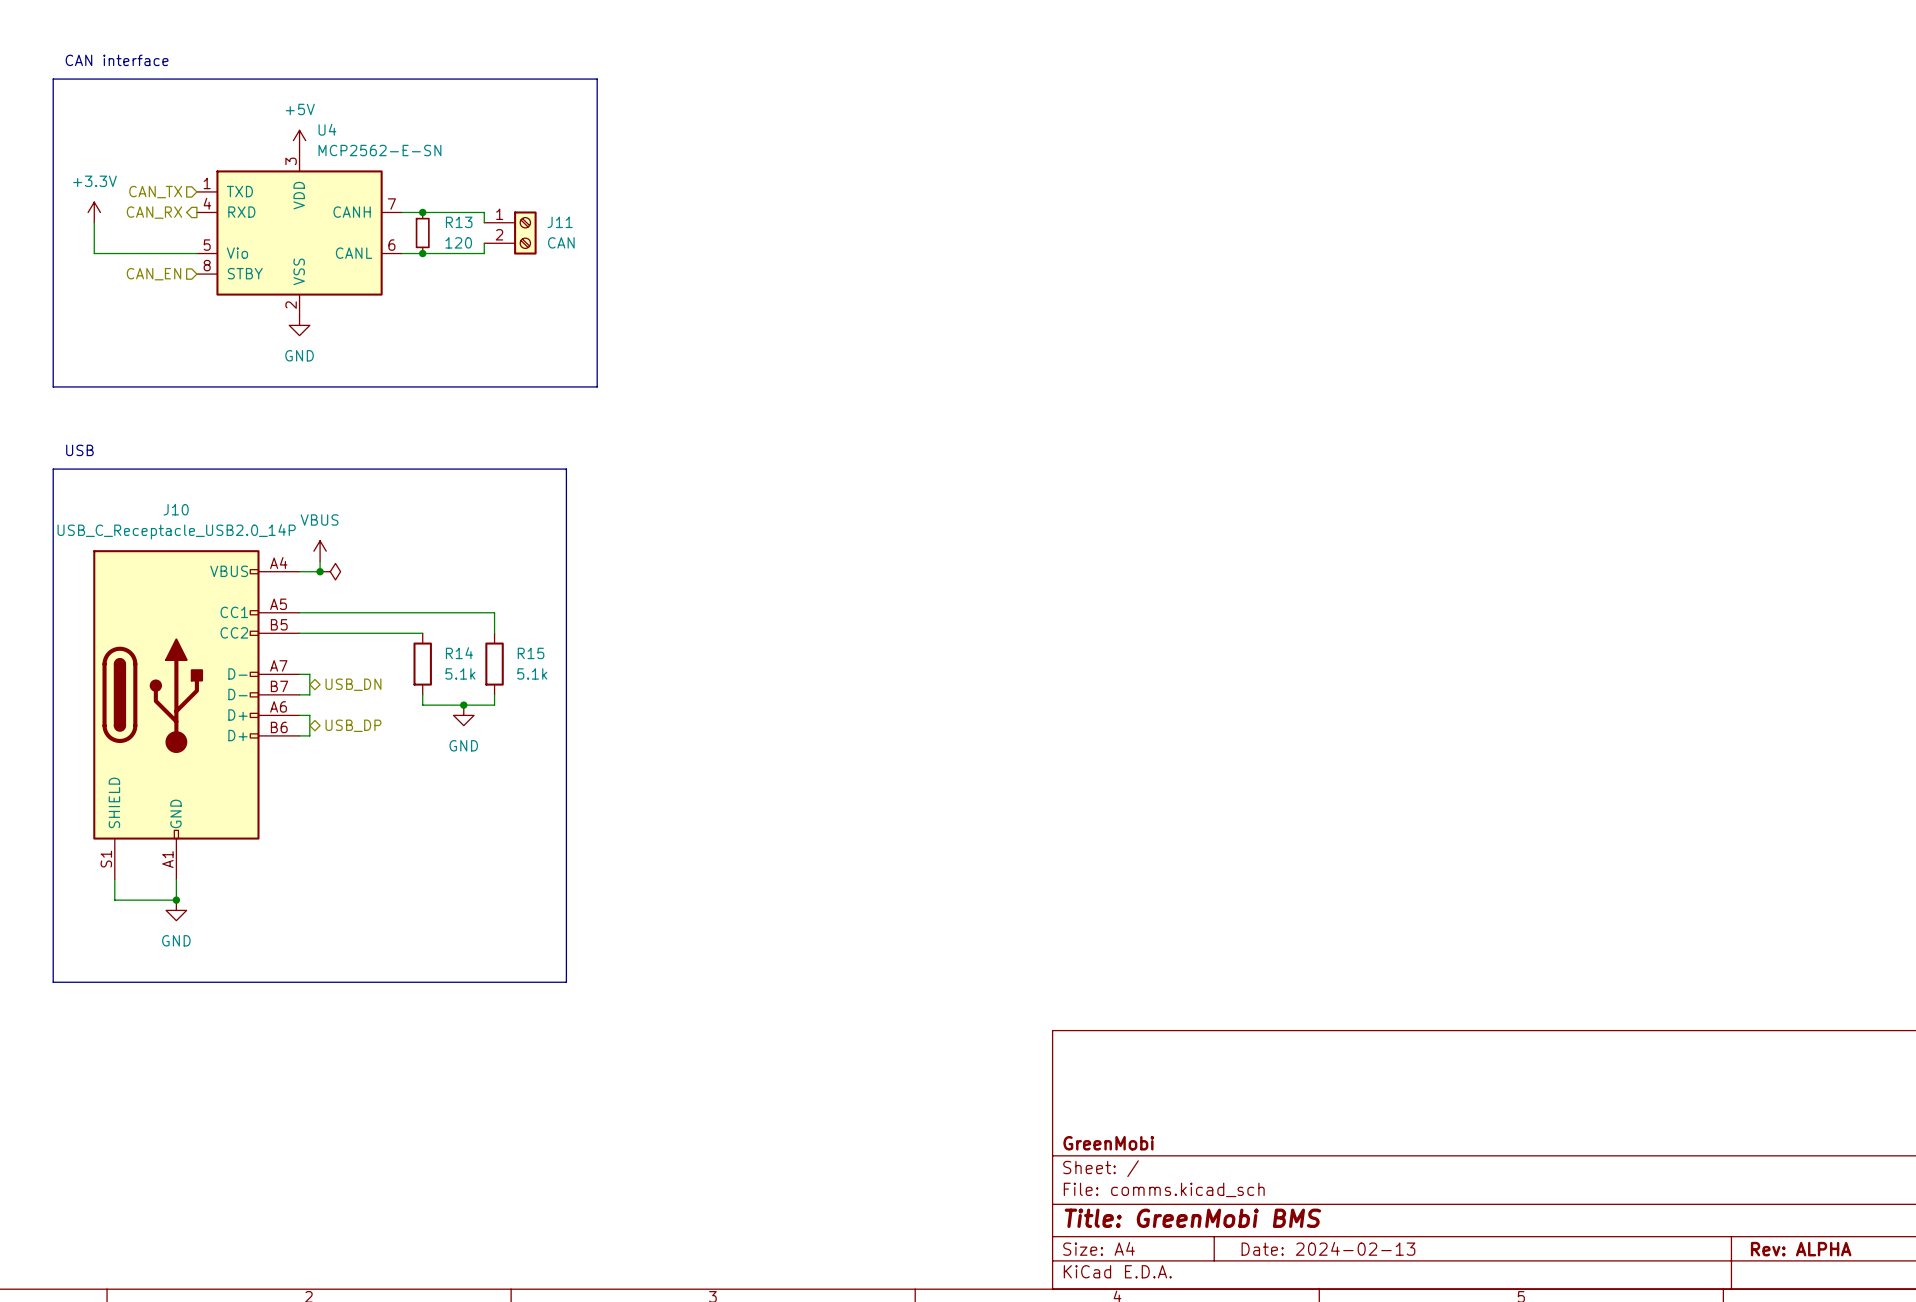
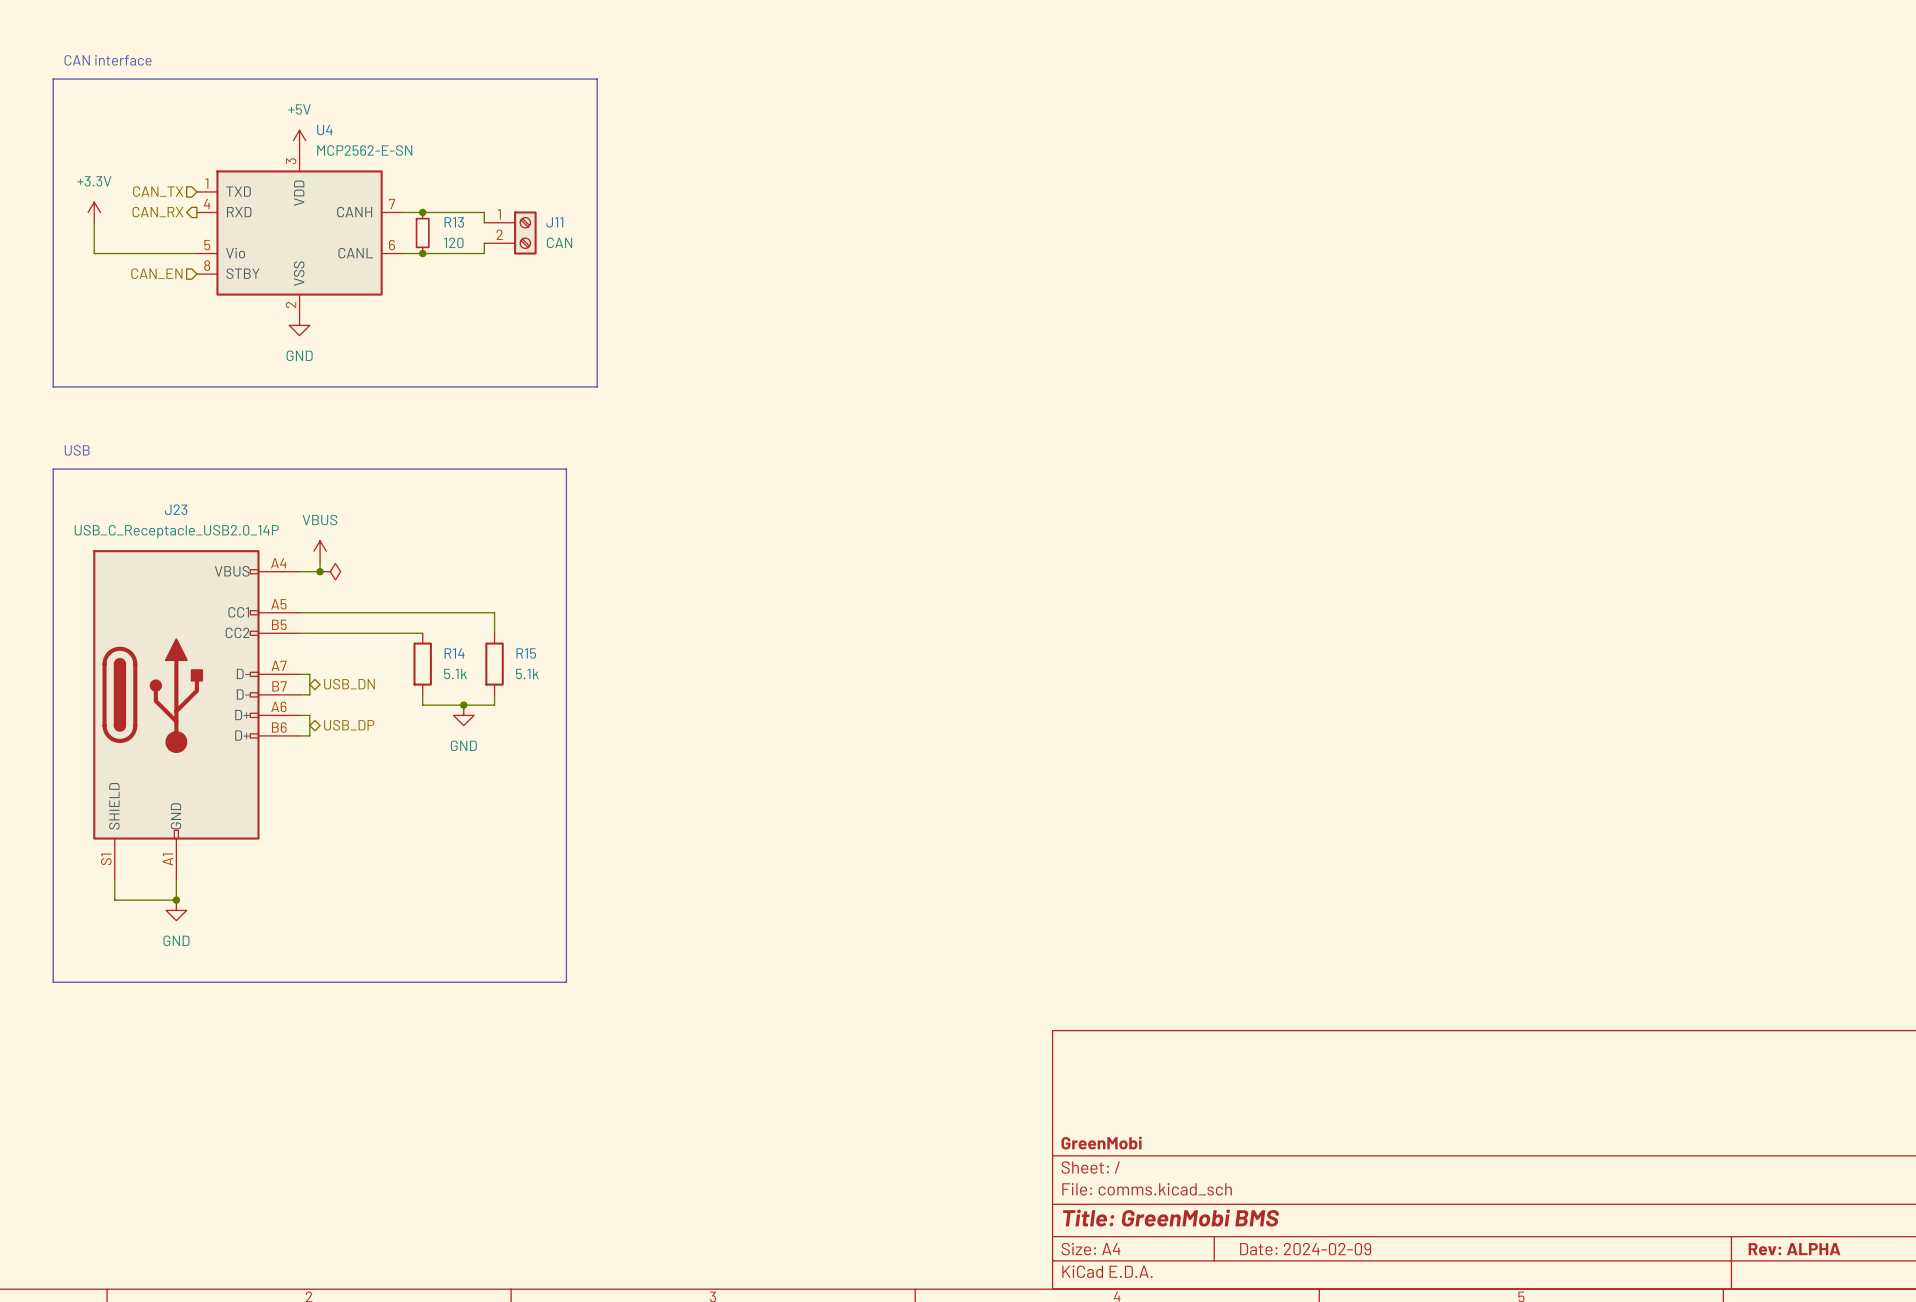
J10 name: J10 (176, 509) -> J23 (176, 509)
title block: Date: 2024-02-13 (1328, 1248) -> Date: 2024-02-09 (1305, 1249)

